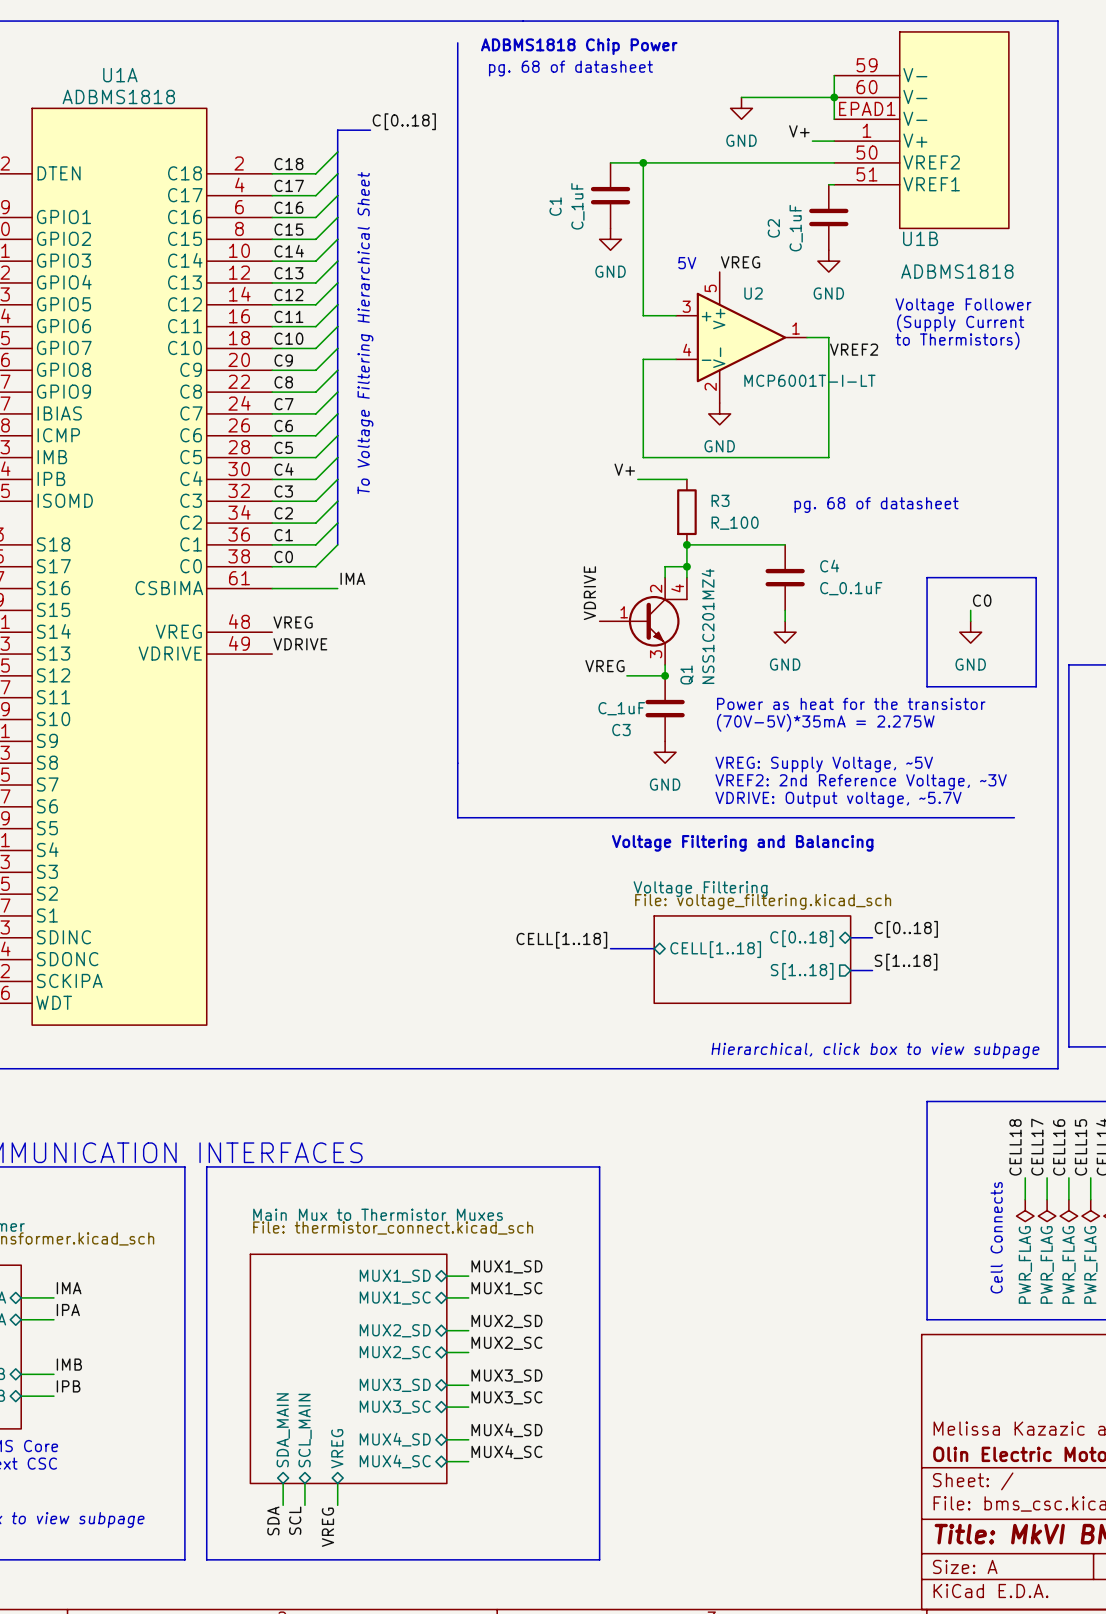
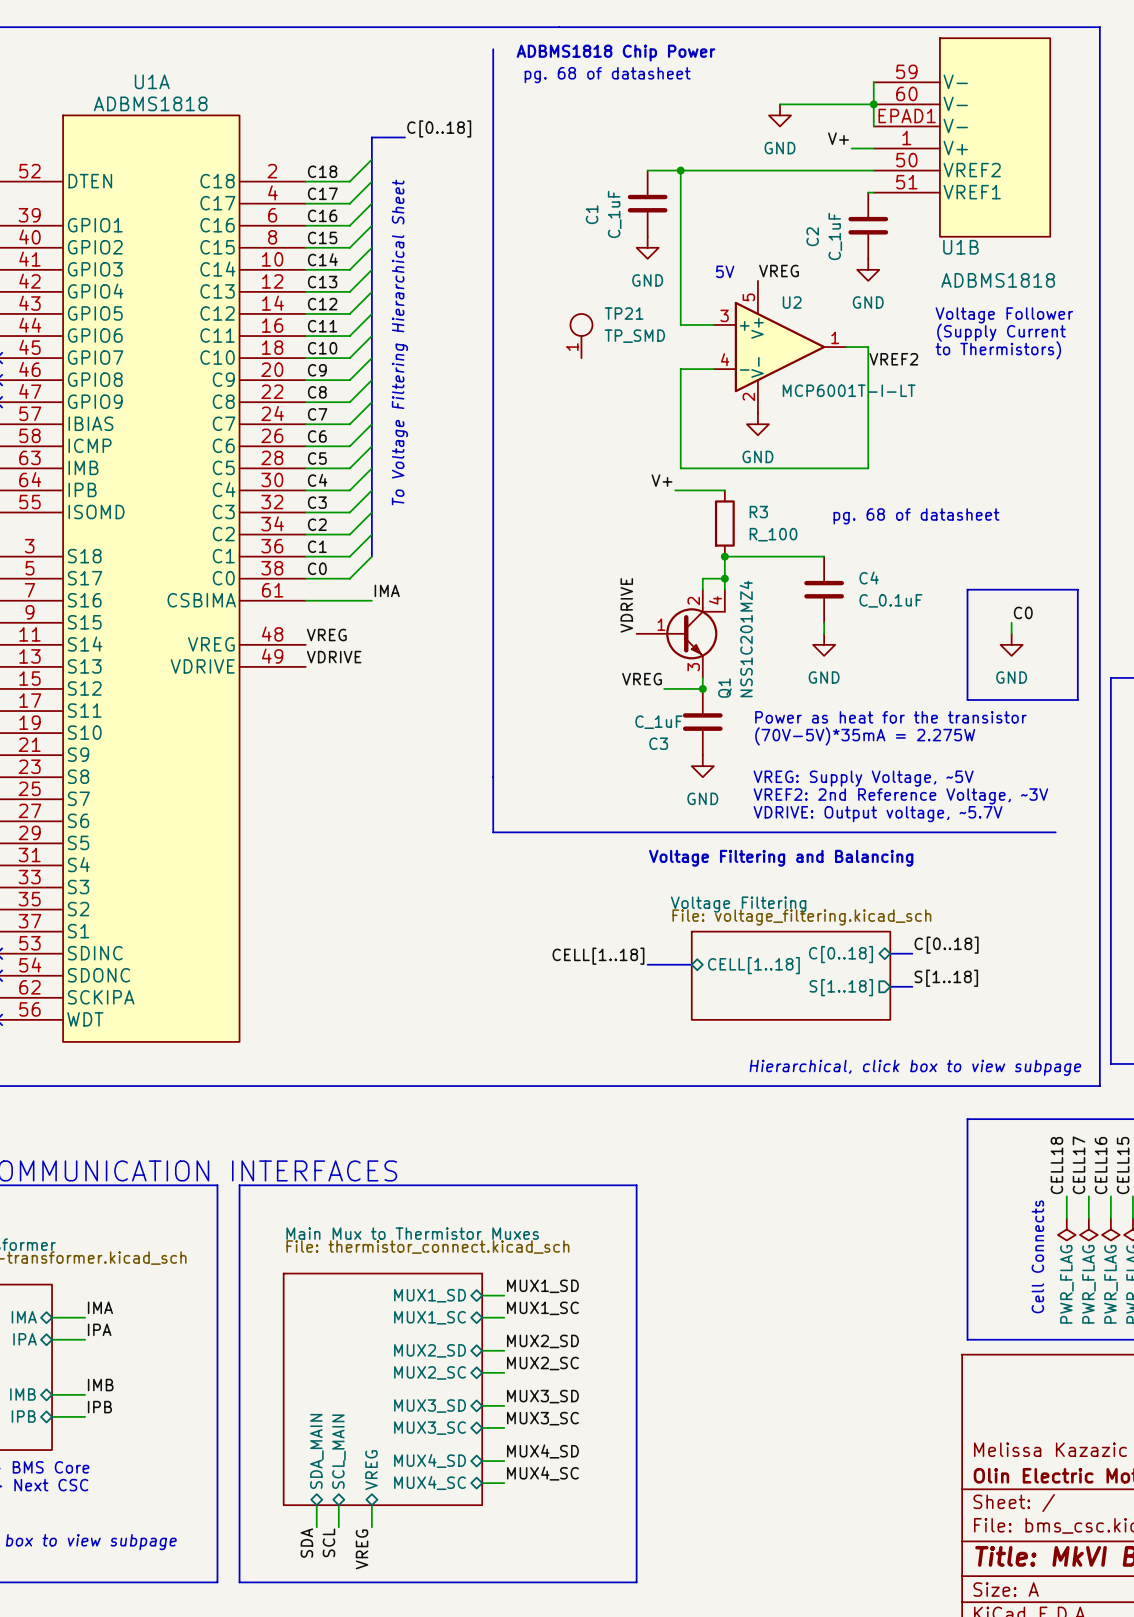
TP21: none -> TP_SMD (581, 336)

